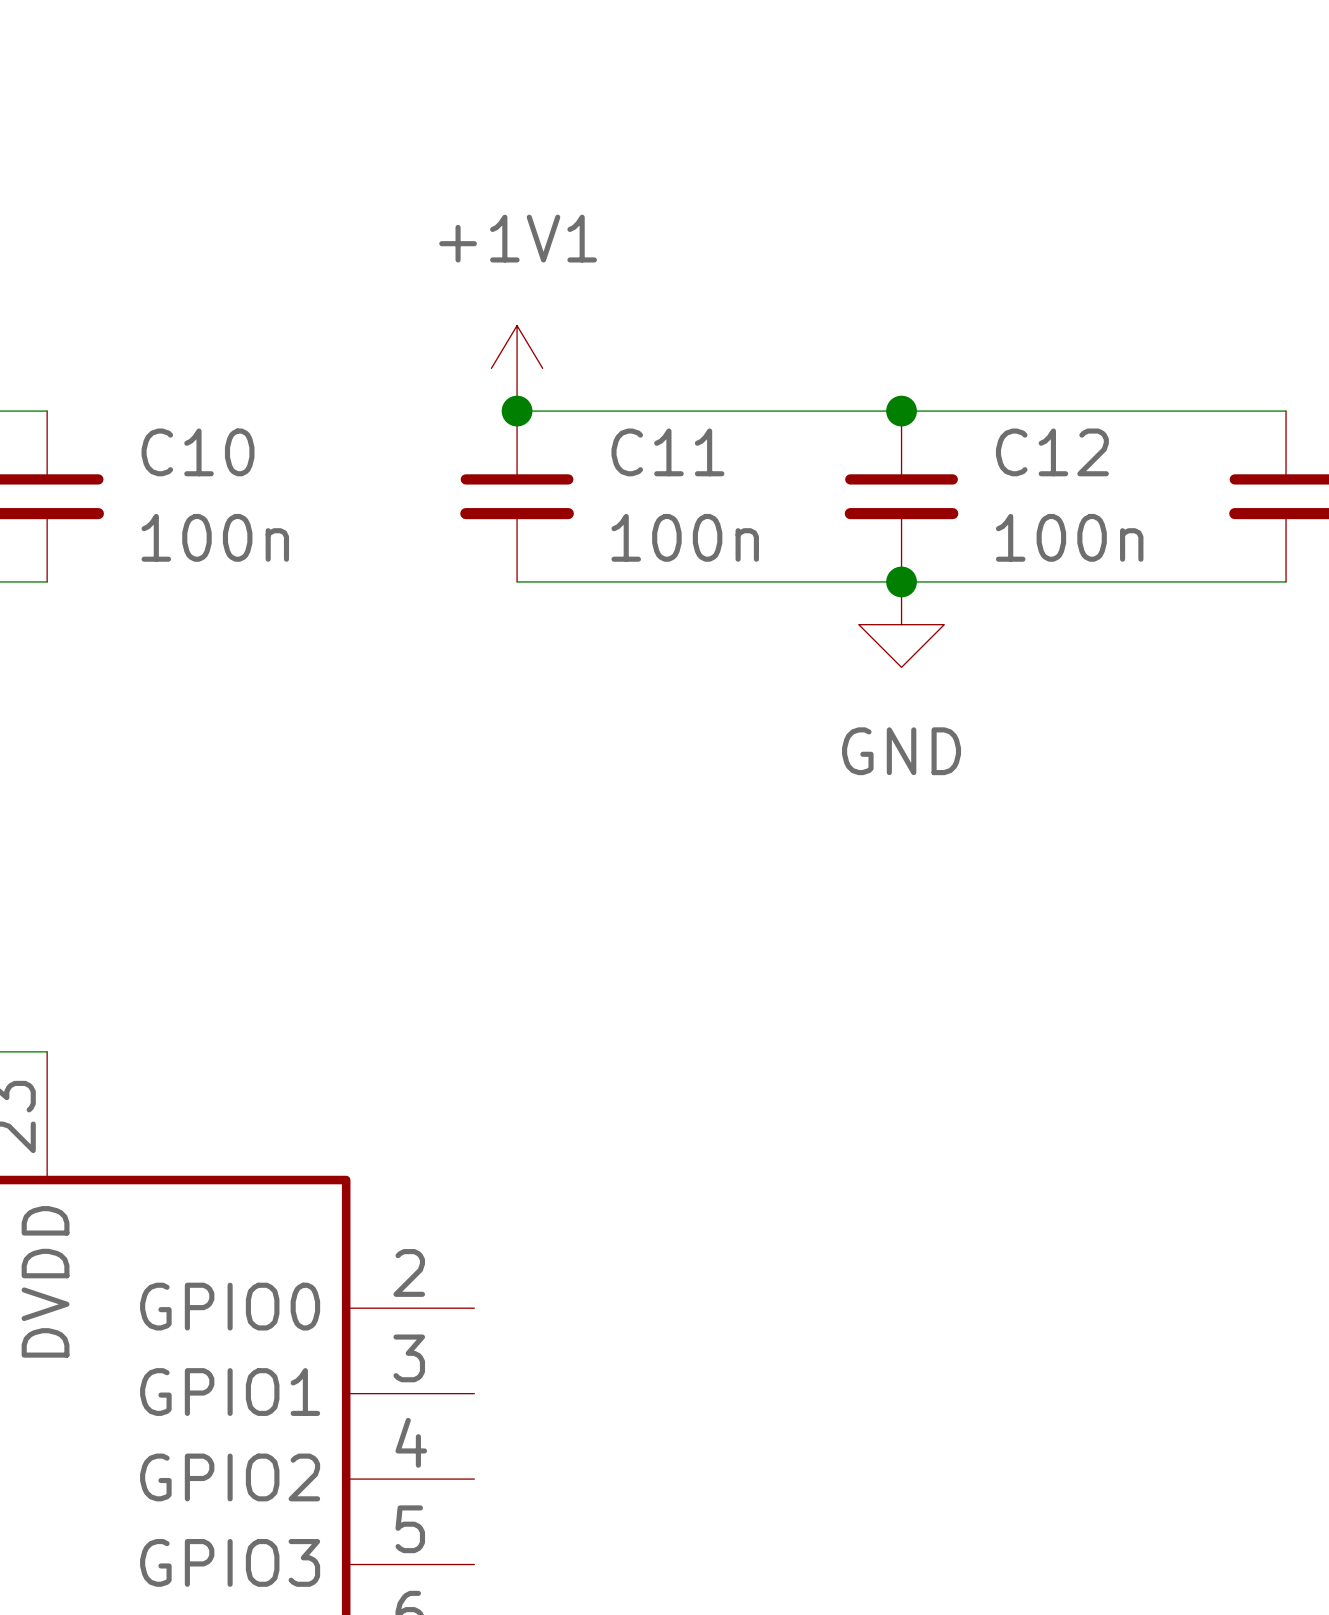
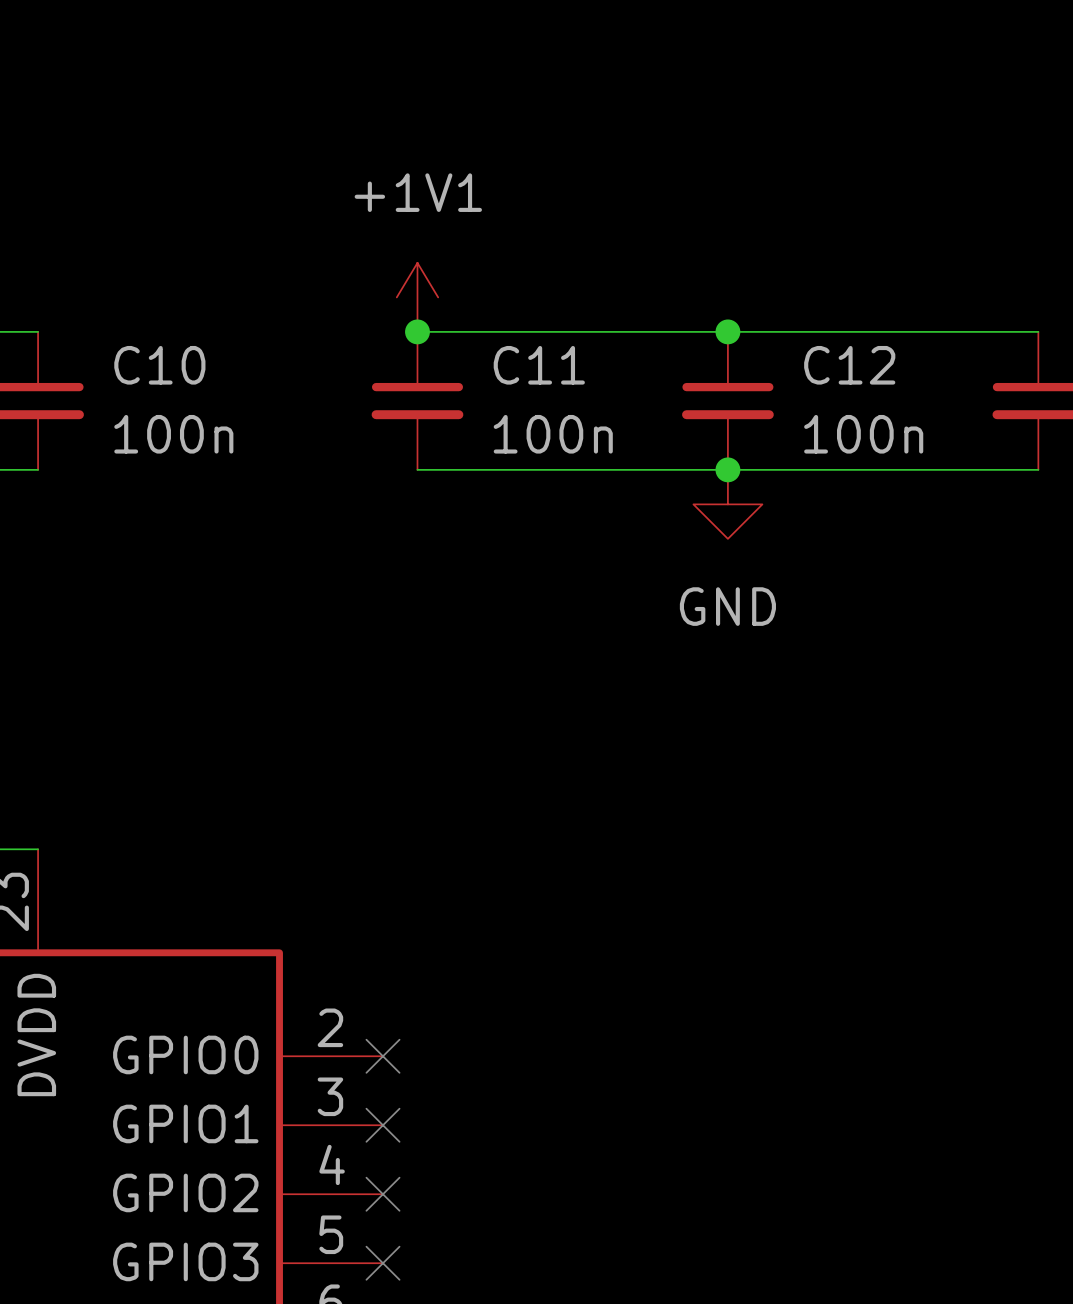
no-connect mark: none -> (382, 1056)
no-connect mark: none -> (382, 1125)
no-connect mark: none -> (382, 1194)
no-connect mark: none -> (382, 1263)

